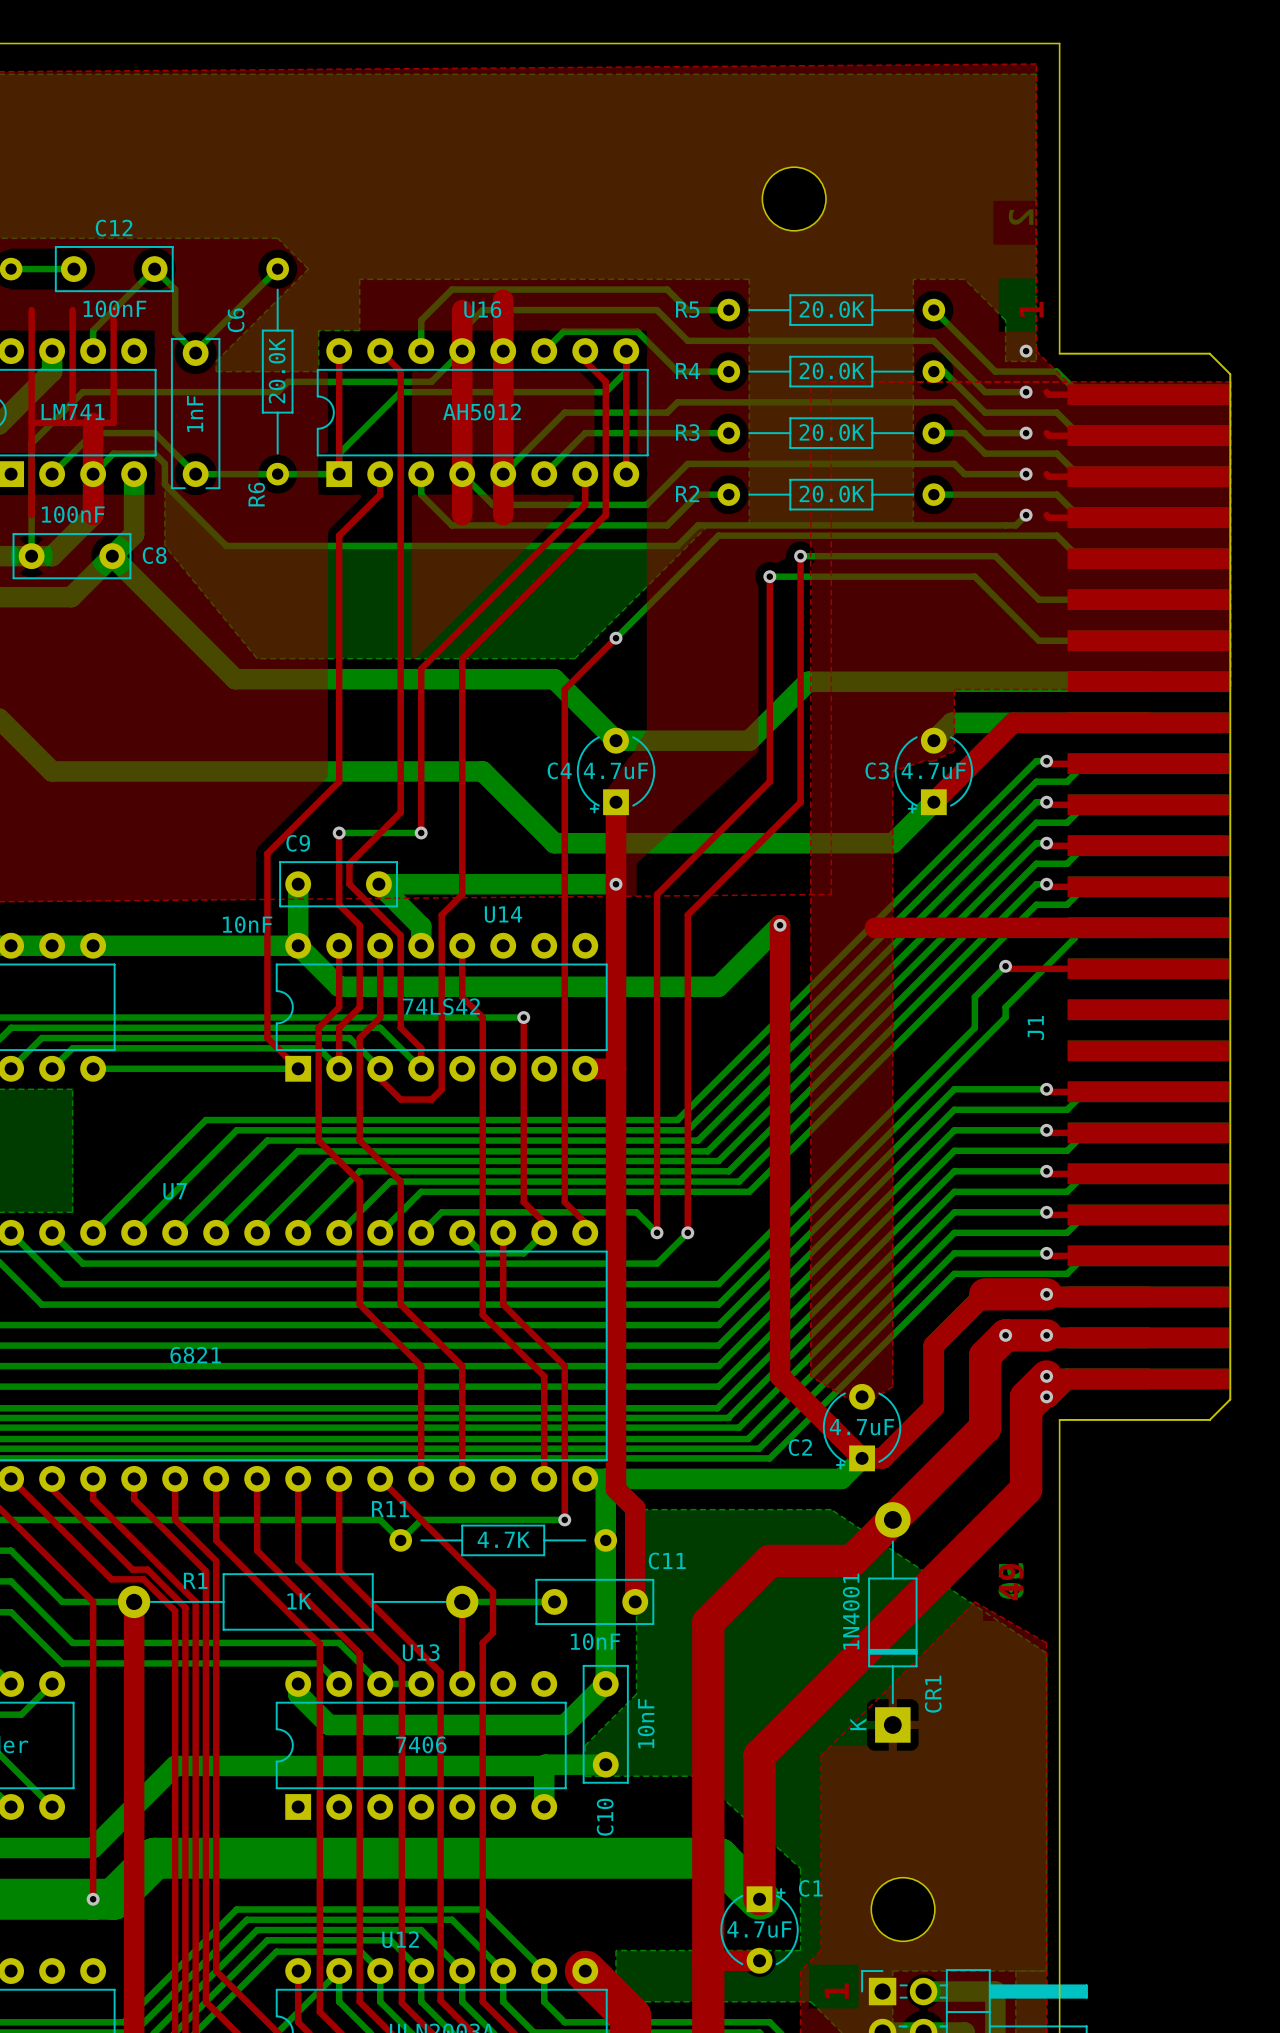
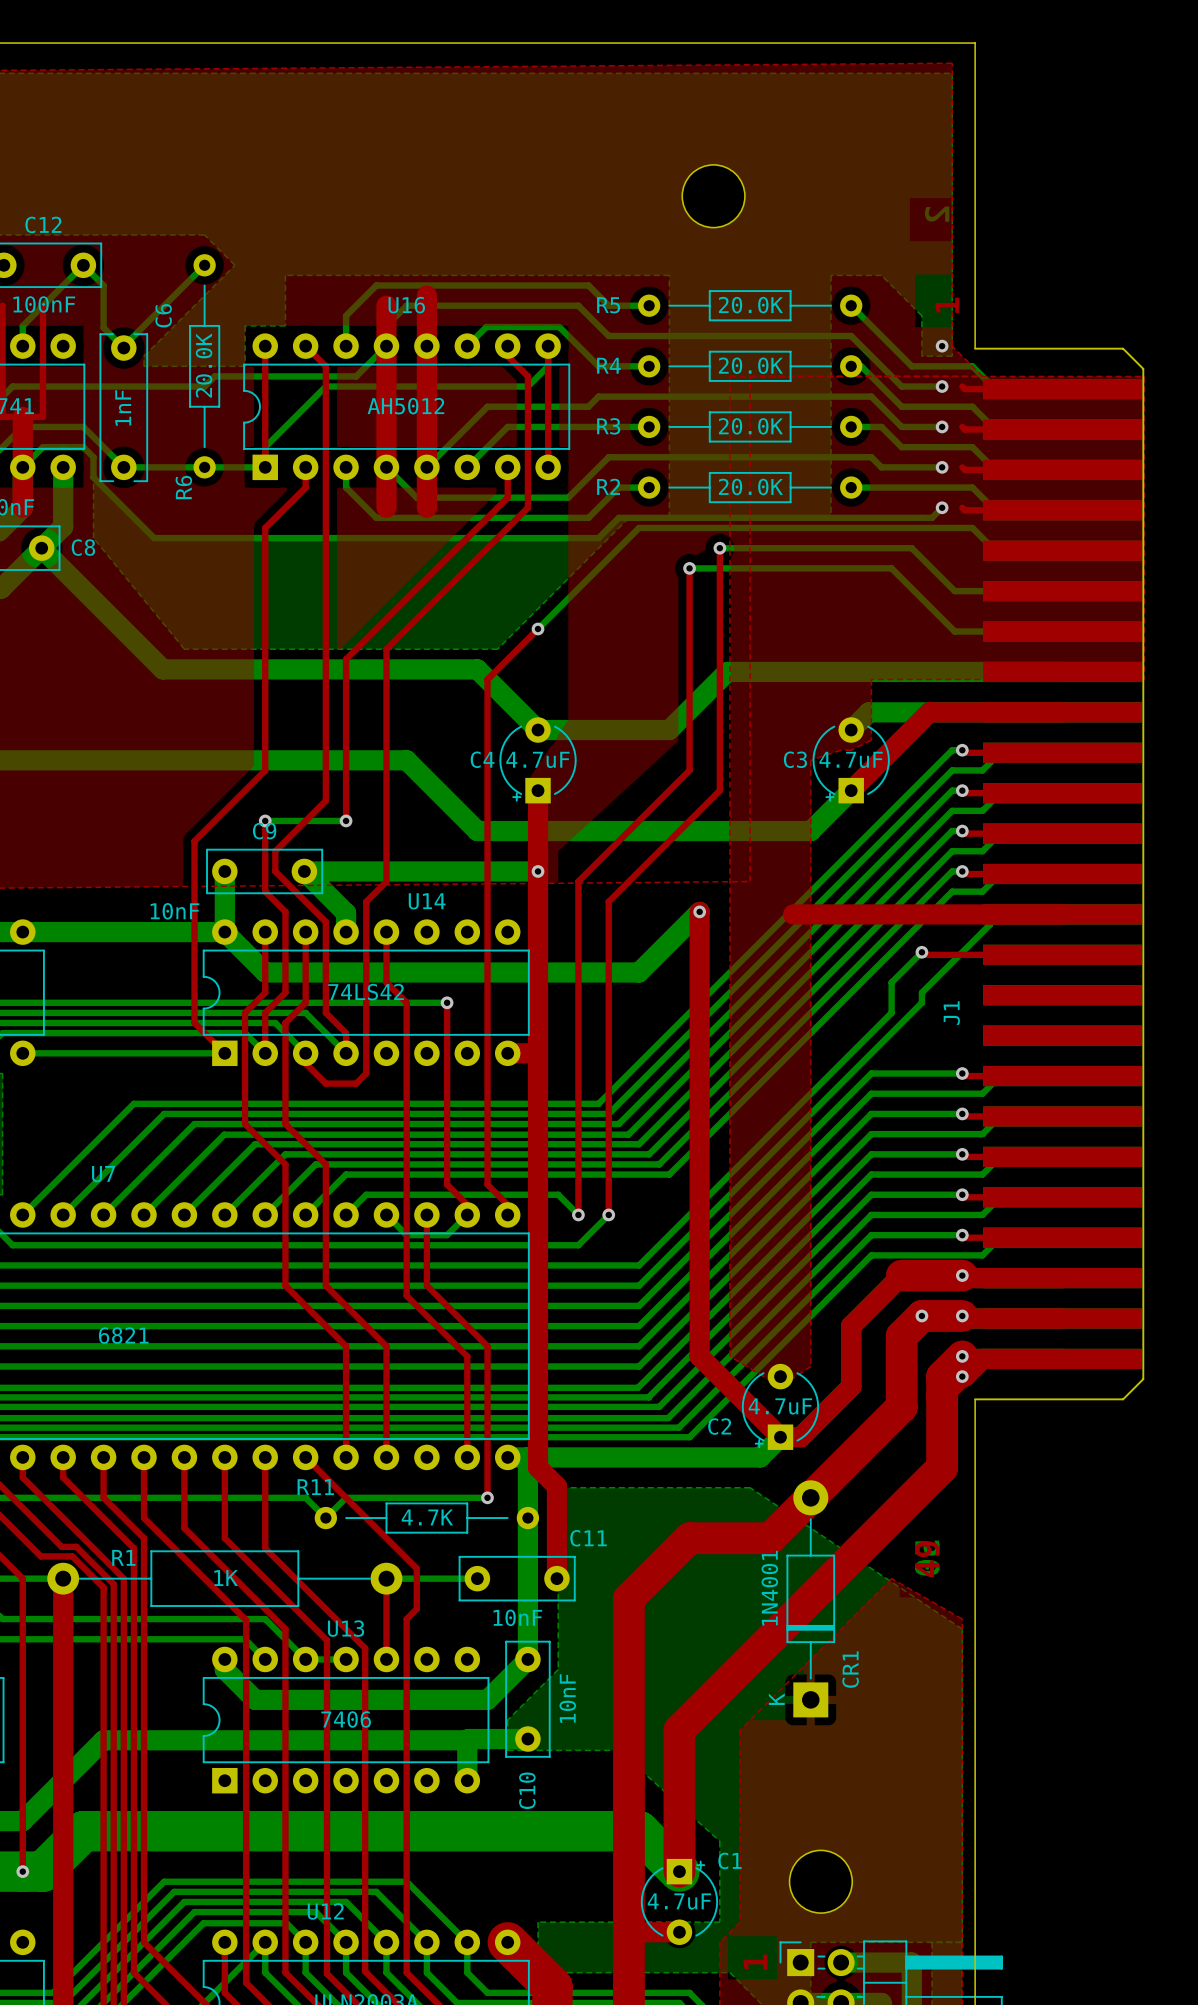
C9 name position: C9 (298, 843) -> C9 (264, 831)

